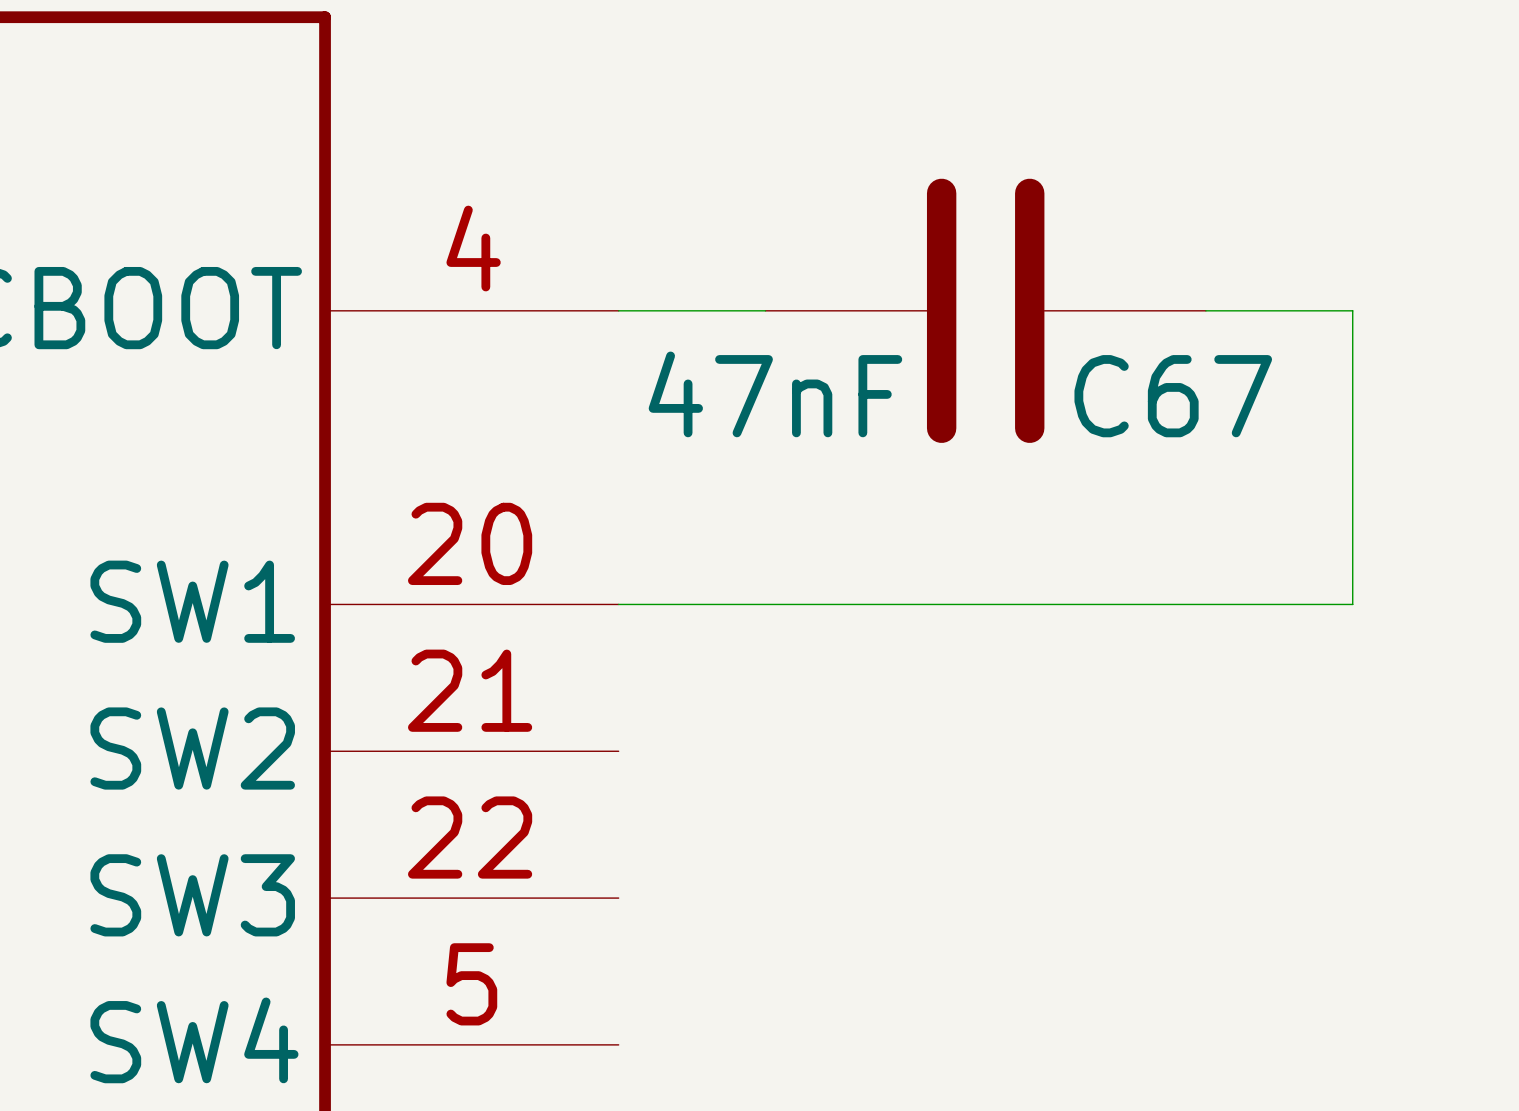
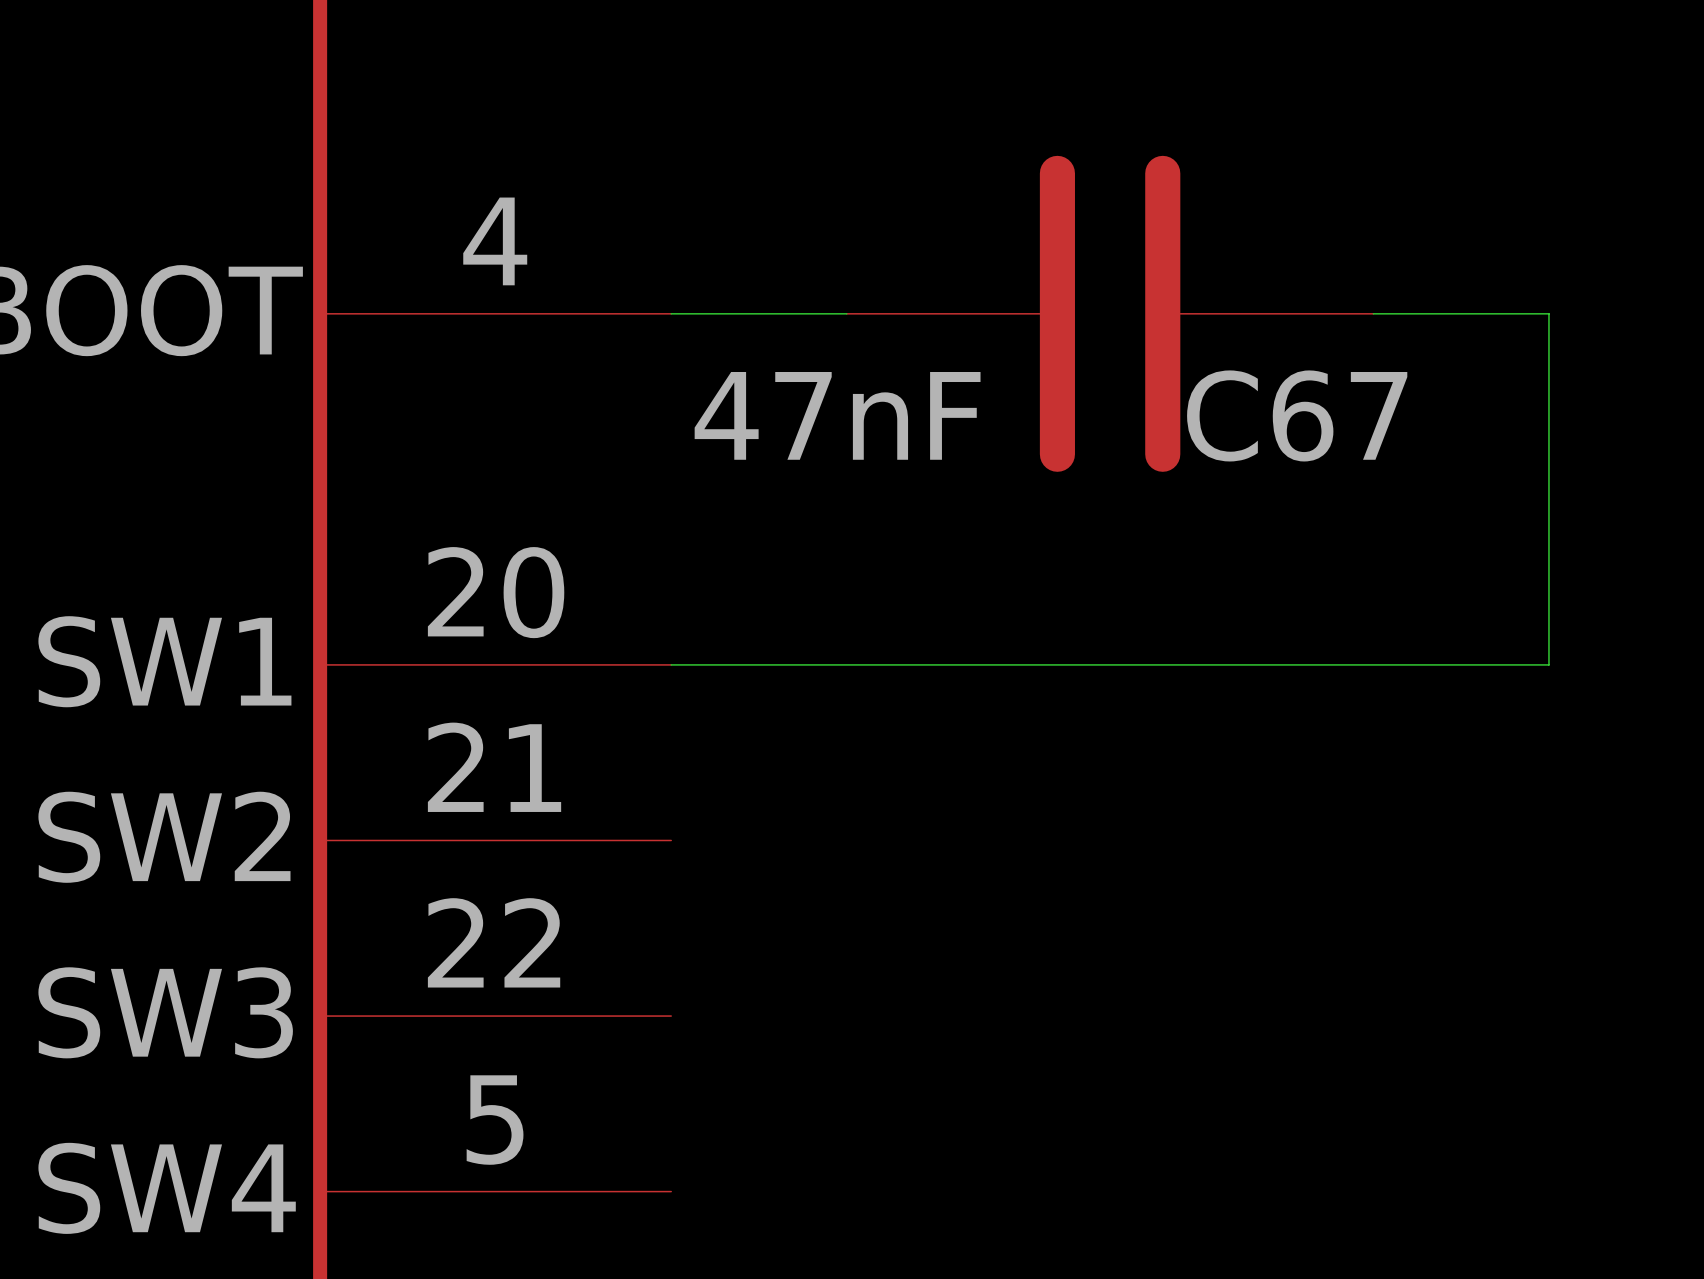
C67 name position: C67 (1173, 396) -> C67 (1297, 415)

